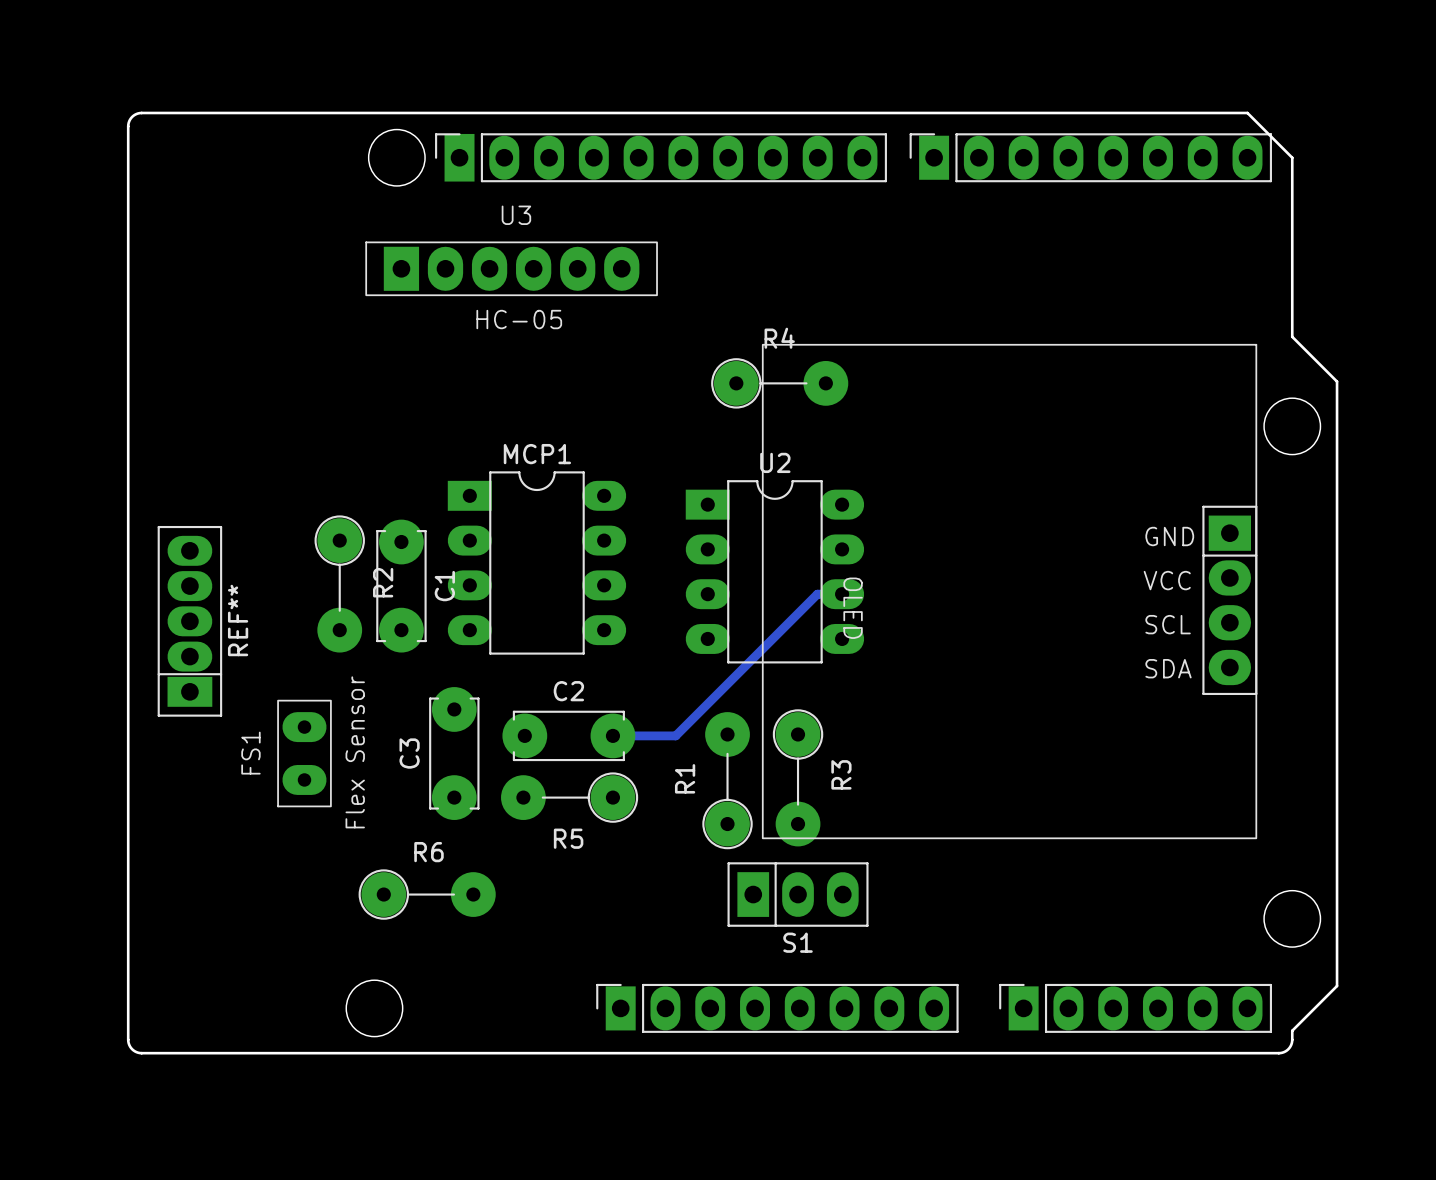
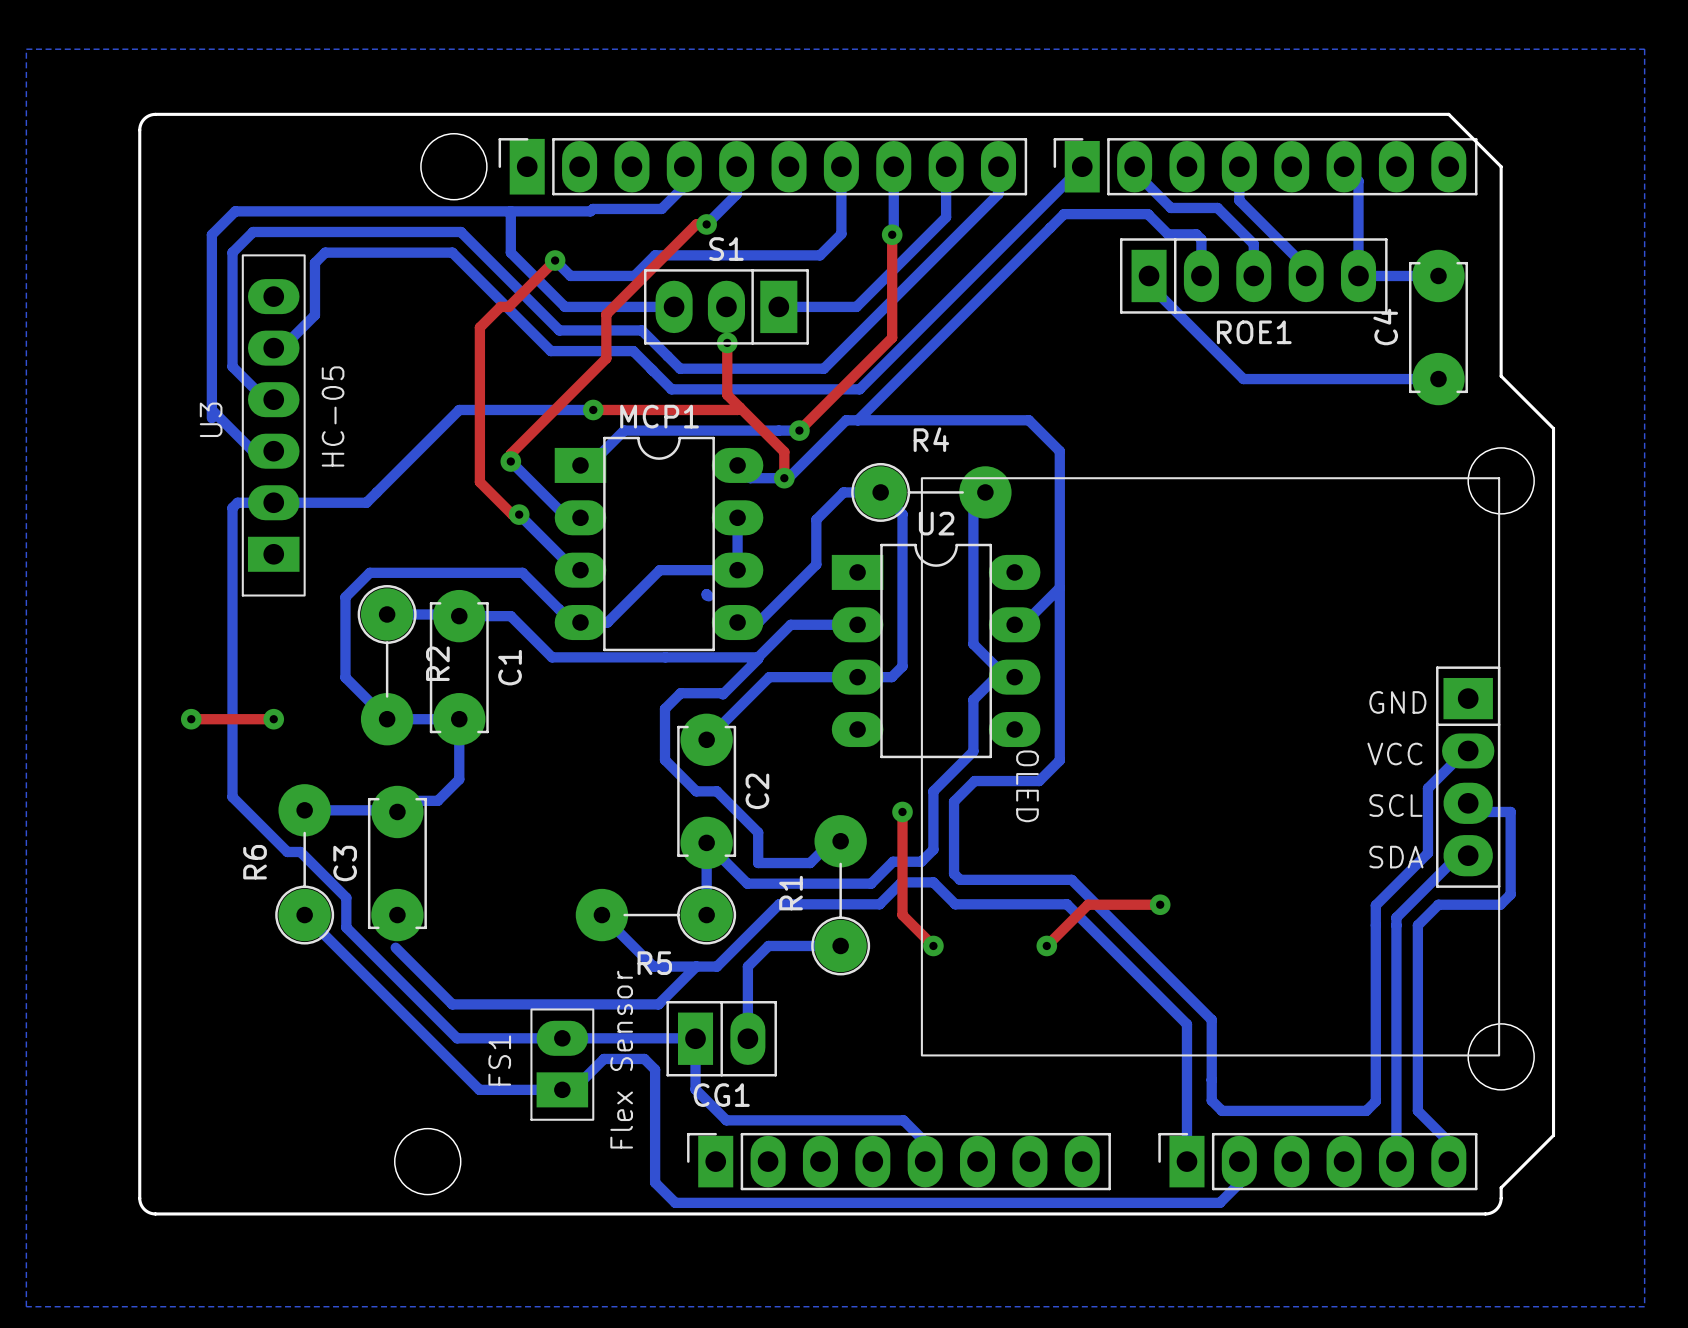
bottom zone outline: none -> (26, 49) (1644, 49) (1644, 1306) (26, 1306) (26, 49)
bottom track: none -> (684, 166) (684, 186) (661, 208) (592, 208) (590, 211) (235, 211) (211, 234) (211, 418)
bottom track: none -> (736, 166) (736, 194) (706, 224)
bottom track: none -> (841, 166) (841, 234) (820, 255) (655, 255) (634, 275) (570, 275) (555, 260)
bottom track: none -> (893, 166) (893, 233)
bottom track: none -> (998, 166) (998, 194) (823, 368) (680, 368) (641, 330) (559, 330) (460, 232) (253, 232) (232, 252) (232, 366) (265, 399) (273, 399)
bottom track: none -> (1082, 166) (859, 389) (671, 389) (633, 351) (550, 351) (452, 252) (325, 252) (314, 262) (314, 315) (281, 348) (273, 348)
bottom track: none -> (1134, 166) (1134, 171) (1170, 207) (1217, 207) (1253, 244) (1253, 275)
bottom track: none -> (1239, 166) (1239, 200) (1306, 267) (1306, 275)
bottom track: none -> (942, 170) (946, 166) (946, 217) (856, 306) (778, 306)
bottom track: none -> (1344, 186) (1344, 166) (1358, 181) (1358, 275) (1438, 275)
bottom track: none -> (510, 211) (510, 252) (565, 306) (674, 306)
top track: none -> (706, 224) (696, 224) (606, 314) (606, 358) (510, 453) (510, 461)
via: none -> (706, 224)
U3 name position: U3 (516, 215) -> U3 (211, 419)
top track: none -> (892, 234) (892, 337) (799, 430)
via: none -> (892, 234)
top track: none -> (555, 260) (508, 306) (500, 306) (479, 327) (479, 482) (512, 514) (519, 514)
via: none -> (555, 260)
U3 footprint: [365, 241, 658, 297] -> [241, 254, 306, 597]
bottom track: none -> (1149, 275) (1149, 284) (1243, 379) (1438, 379)
bottom track: none -> (1201, 275) (1201, 239) (1196, 234) (1168, 234) (1147, 214) (1064, 214) (857, 420)
ROE1: none -> (1253, 275)
C4: none -> (1438, 327)
top track: none -> (727, 342) (727, 394) (784, 451) (784, 478)
via: none -> (727, 342)
top track: none -> (739, 407) (737, 409) (593, 409)
bottom track: none -> (211, 409) (253, 451) (273, 451)
bottom track: none -> (593, 409) (459, 409) (366, 502) (237, 502) (232, 507) (232, 797) (287, 851) (300, 851) (346, 897) (346, 927) (457, 1038) (695, 1038) (695, 1089) (726, 1120) (903, 1120) (925, 1142) (925, 1161)
via: none -> (593, 409)
bottom track: none -> (799, 430) (624, 430) (589, 465) (580, 463)
via: none -> (799, 430)
R4 position: (779, 383) -> (931, 492)
bottom track: none -> (510, 461) (567, 517) (580, 517)
via: none -> (510, 461)
bottom track: none -> (737, 465) (750, 478) (788, 478) (846, 420) (1028, 420) (1059, 451) (1059, 760) (1039, 781) (974, 781) (954, 801) (954, 873) (960, 879) (1071, 879) (1211, 1019) (1211, 1100) (1222, 1110) (1366, 1110) (1375, 1101) (1375, 905) (1427, 853) (1427, 788) (1465, 750) (1468, 750)
via: none -> (784, 478)
bottom track: none -> (985, 492) (973, 504) (973, 644) (1006, 677)
bottom track: none -> (519, 514) (574, 570) (580, 570)
via: none -> (519, 514)
bottom track: none -> (737, 517) (737, 570) (659, 570) (607, 622) (572, 622) (522, 572) (369, 572) (345, 597) (345, 677) (387, 719) (459, 719) (459, 779) (437, 800) (408, 800) (397, 811) (395, 810) (304, 810)
bottom track: none -> (1059, 587) (1022, 624) (1014, 624)
bottom track: none -> (706, 595) (708, 596)
bottom track: none -> (387, 614) (510, 616) (552, 657) (758, 657)
bottom track: none -> (737, 622) (758, 622) (816, 564) (816, 519) (843, 492) (880, 492) (902, 514) (902, 666) (891, 677) (769, 677) (706, 739)
bottom track: none -> (857, 624) (790, 624) (758, 657)
MCP1 position: (536, 562) -> (659, 543)
U2 position: (774, 571) -> (936, 650)
bottom track: none -> (758, 657) (722, 694) (680, 693) (664, 708) (664, 760) (696, 791) (716, 791) (758, 832) (758, 863) (810, 863) (831, 841) (840, 841)
part: (1009, 591) -> none
bottom track: (842, 594) (817, 594) (675, 735) (612, 735) -> none
bottom track: none -> (1014, 677) (996, 677) (973, 699) (973, 751) (933, 791) (933, 849) (921, 861) (893, 861) (871, 883) (747, 883) (706, 842) (706, 915)
REF**: (189, 621) -> none
top track: none -> (191, 719) (273, 719)
via: none -> (191, 719)
via: none -> (273, 719)
part: none -> (1210, 766)
FS1 footprint: [277, 699, 332, 808] -> [530, 1008, 595, 1121]
bottom track: none -> (1468, 803) (1476, 811) (1510, 811) (1510, 894) (1500, 904) (1438, 904) (1417, 925) (1417, 1110) (1448, 1141) (1448, 1161)
top track: none -> (902, 811) (902, 915) (933, 945)
via: none -> (902, 811)
C2 rotation: 0° (568, 735) -> 90° clockwise (706, 791)
bottom track: none -> (1468, 855) (1458, 855) (1396, 917) (1396, 1161)
C3 position: (454, 753) -> (397, 863)
R3: (798, 777) -> none
top track: none -> (1160, 904) (1088, 904) (1046, 945)
via: none -> (1160, 904)
bottom track: none -> (304, 915) (479, 1089) (573, 1089) (603, 1058) (644, 1058) (655, 1069) (655, 1182) (675, 1202) (1219, 1202) (1239, 1183) (1239, 1161)
bottom track: none -> (582, 915) (601, 915) (653, 966) (716, 966) (779, 904) (879, 904) (901, 882) (933, 882) (955, 904) (1066, 904) (1186, 1024) (1186, 1161)
bottom track: none -> (840, 945) (768, 945) (747, 966) (747, 1038)
via: none -> (933, 945)
via: none -> (1046, 945)
bottom track: none -> (395, 947) (452, 1004) (658, 1004) (696, 966)
R6 rotation: 0° (427, 894) -> 90° counterclockwise (304, 864)
R6 position: (427, 894) -> (304, 864)
S1 rotation: 0° (798, 894) -> 180° (726, 306)
S1 position: (798, 894) -> (726, 306)
CG1: none -> (721, 1038)

